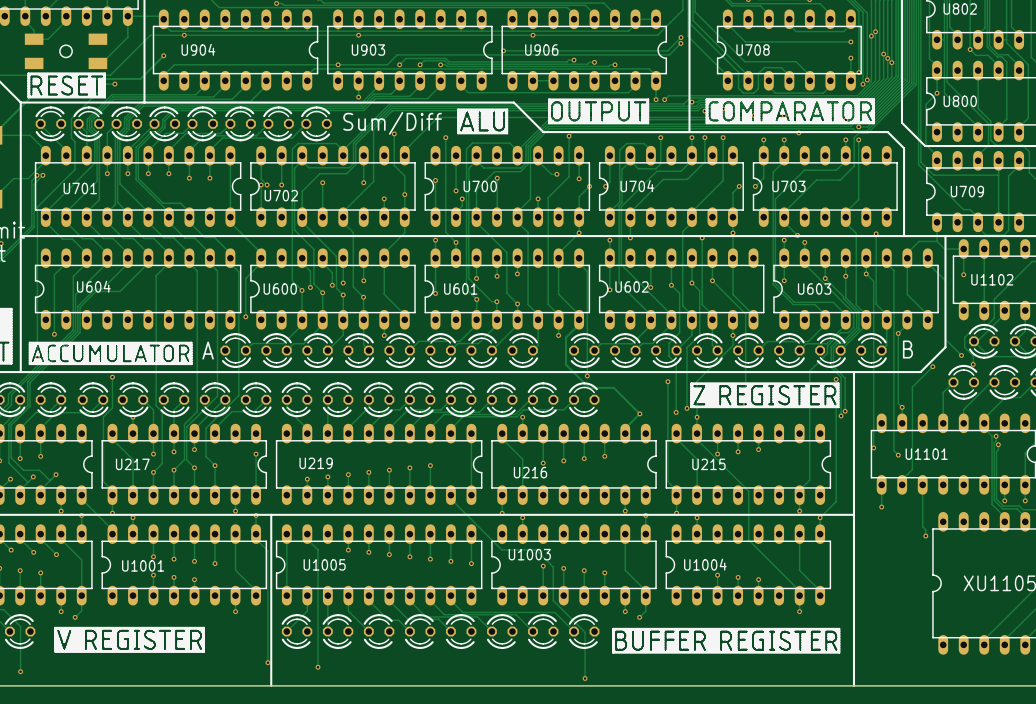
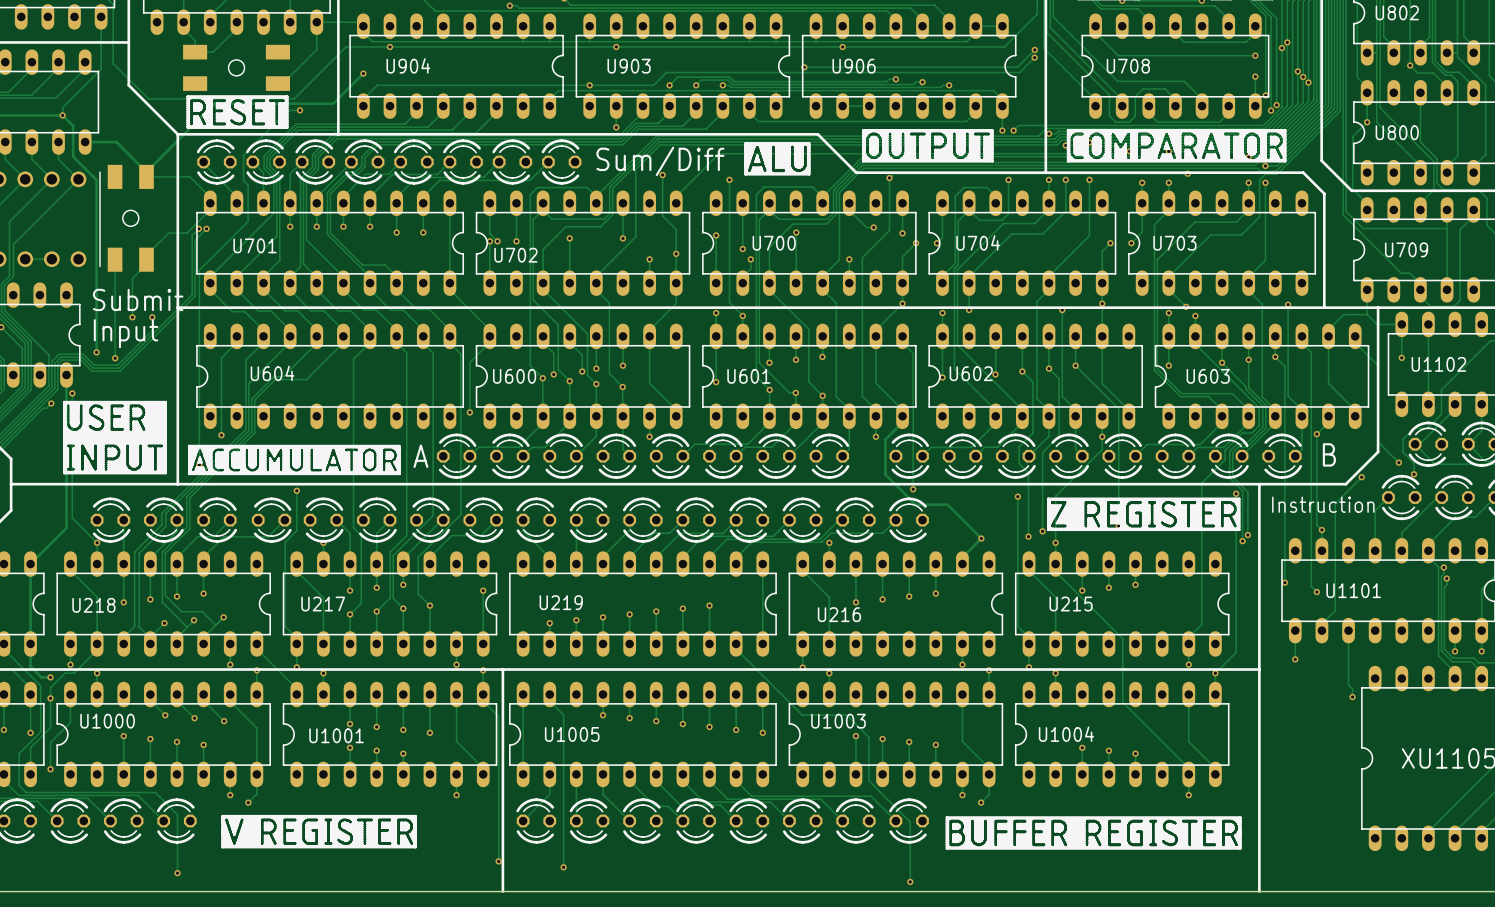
text: none -> Instruction (1323, 504)

